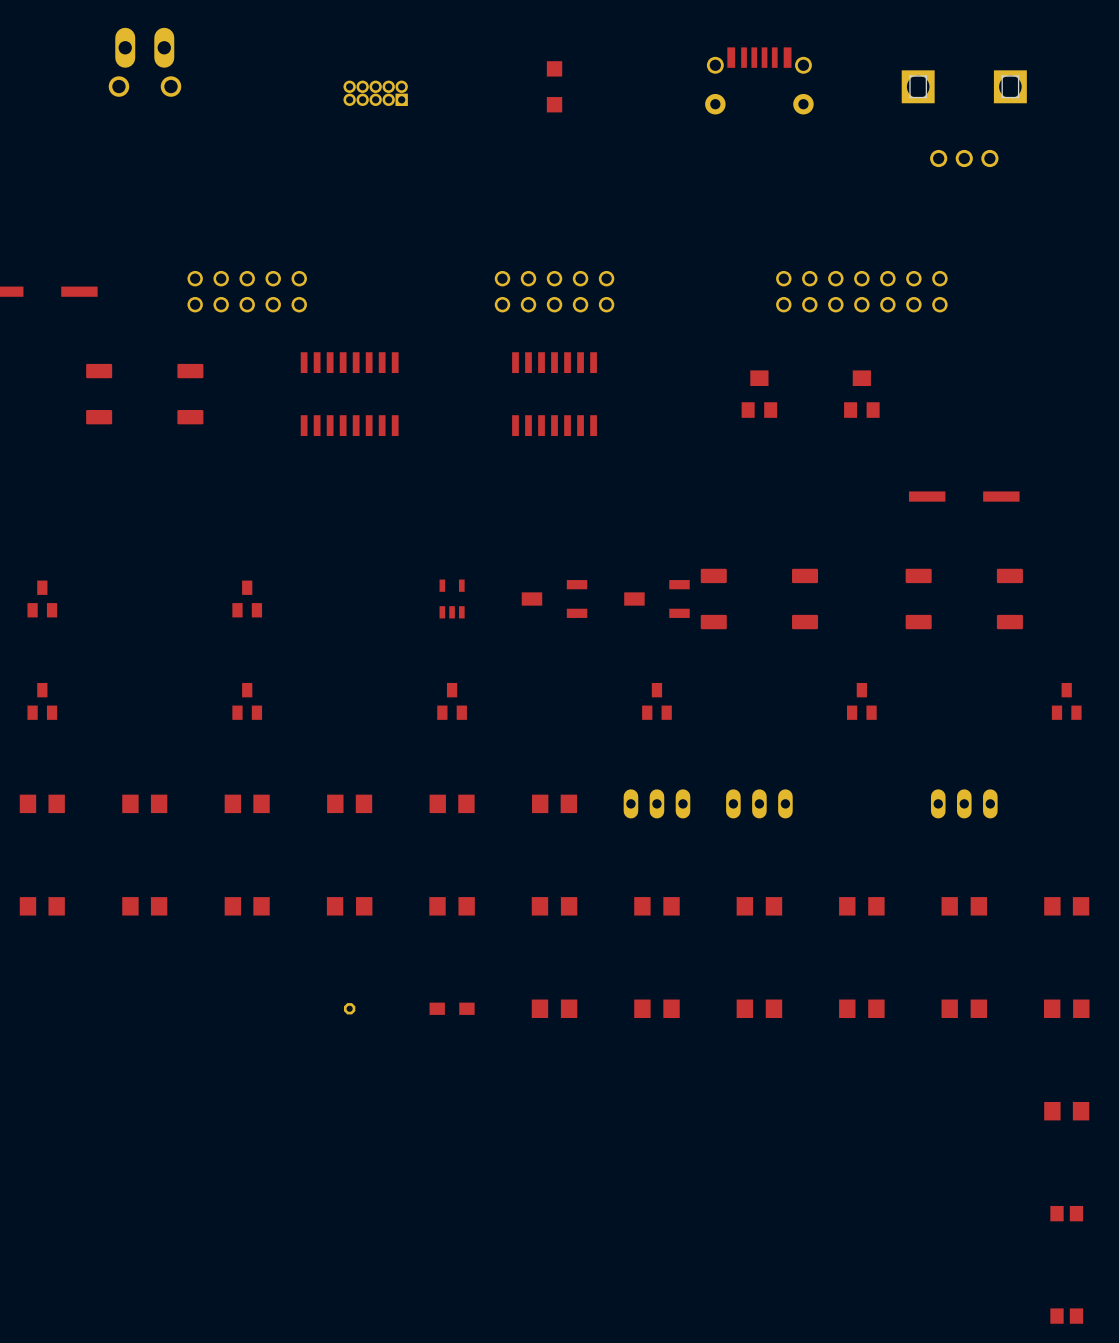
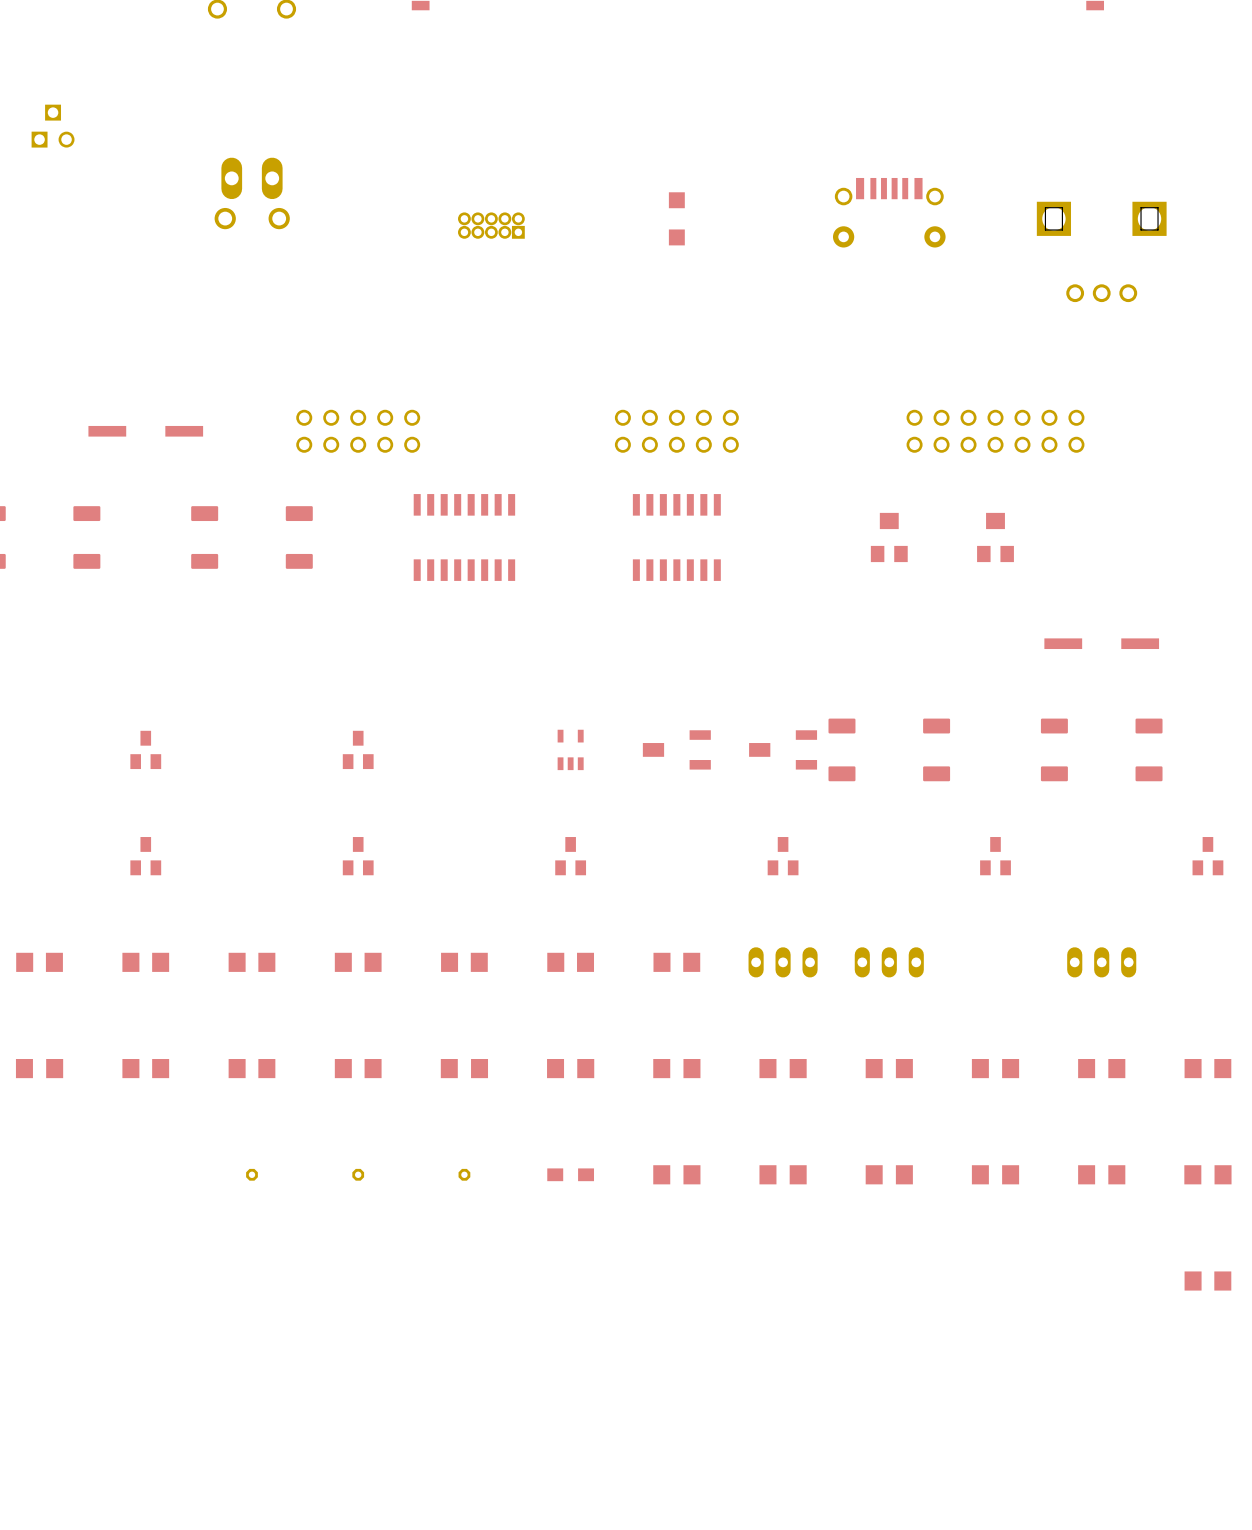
part: none -> (251, 1174)
part: none -> (358, 1174)
part: (1066, 1213) -> none
part: (1066, 1316) -> none

